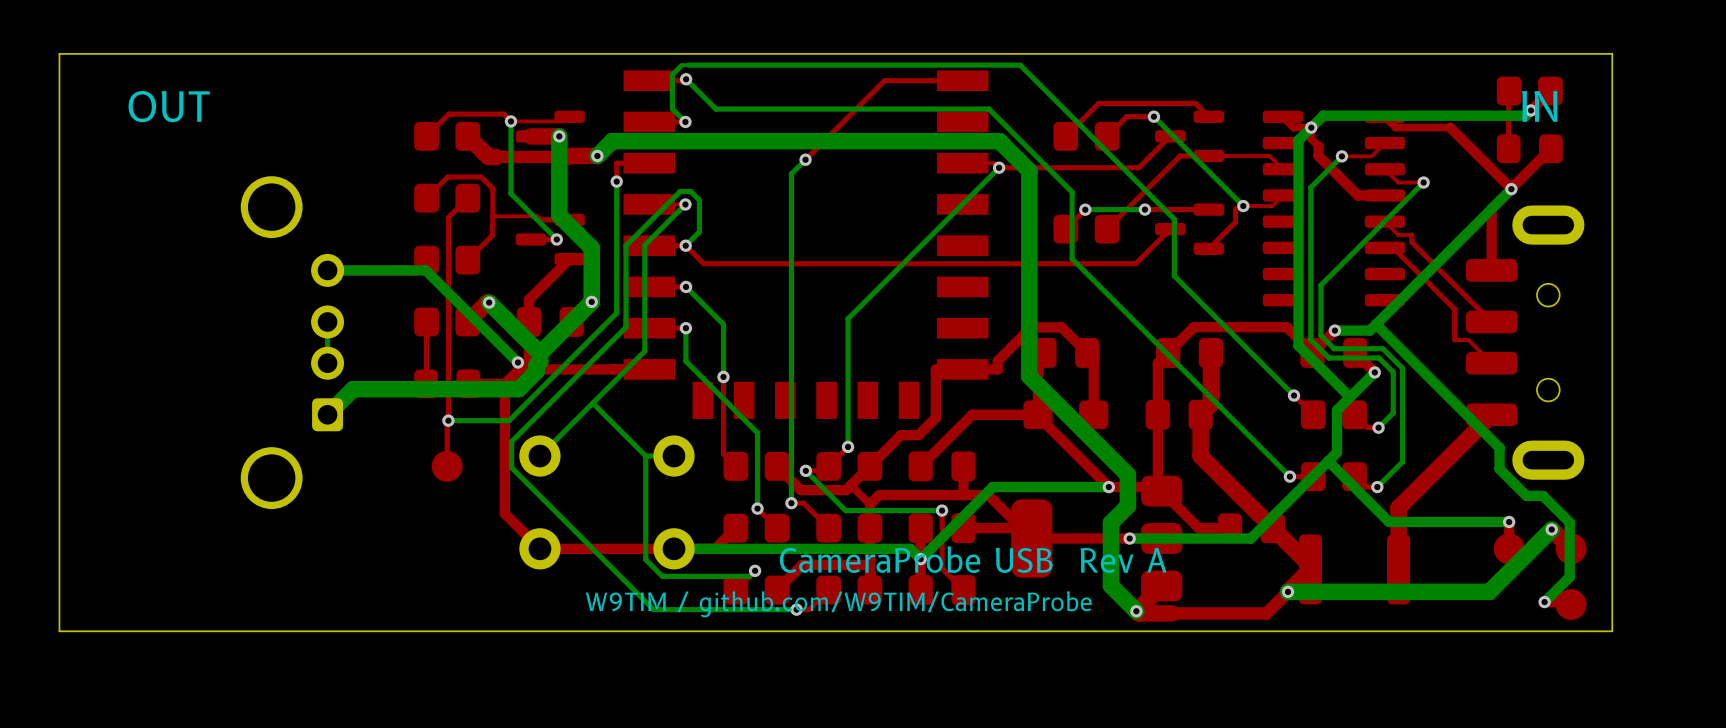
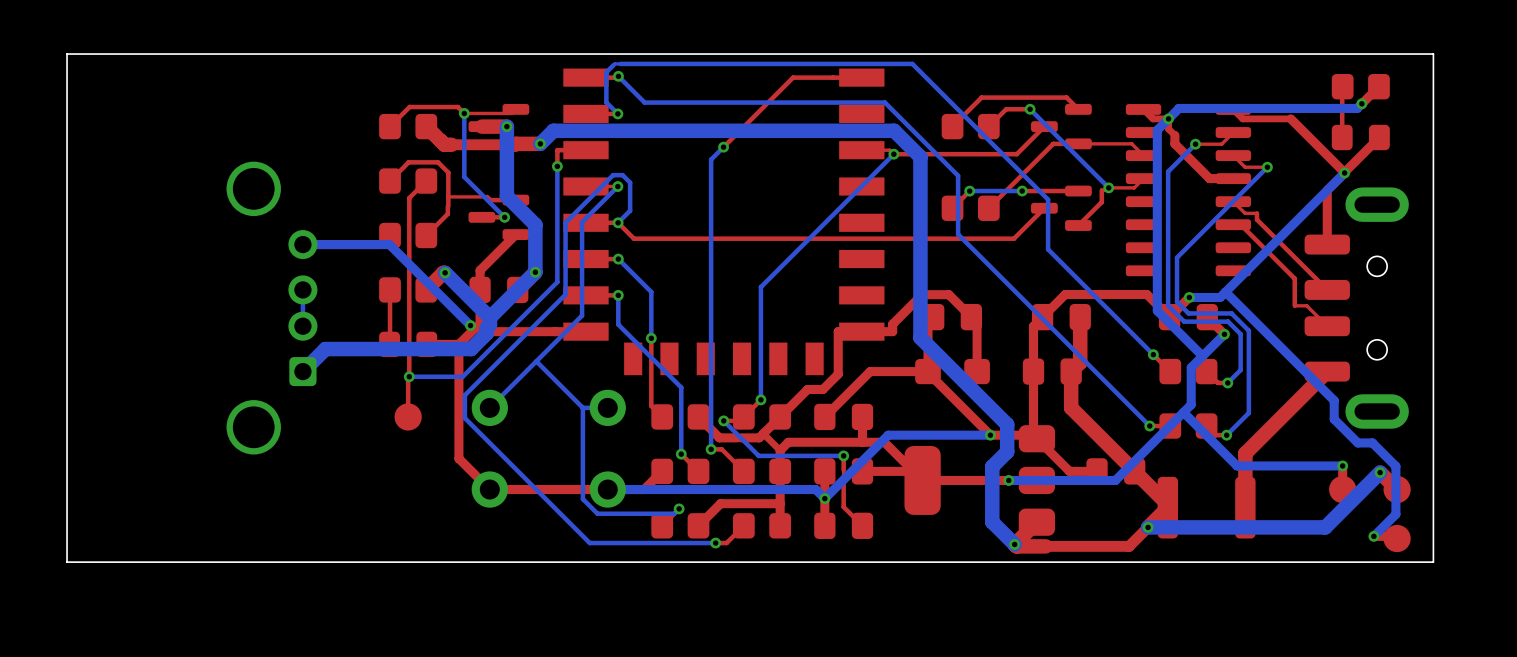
text: OUT (169, 106) -> none
text: IN (1539, 106) -> none
text: CameraProbe USB Rev A (973, 559) -> none
text: W9TIM / github.com/W9TIM/CameraProbe (838, 604) -> none

